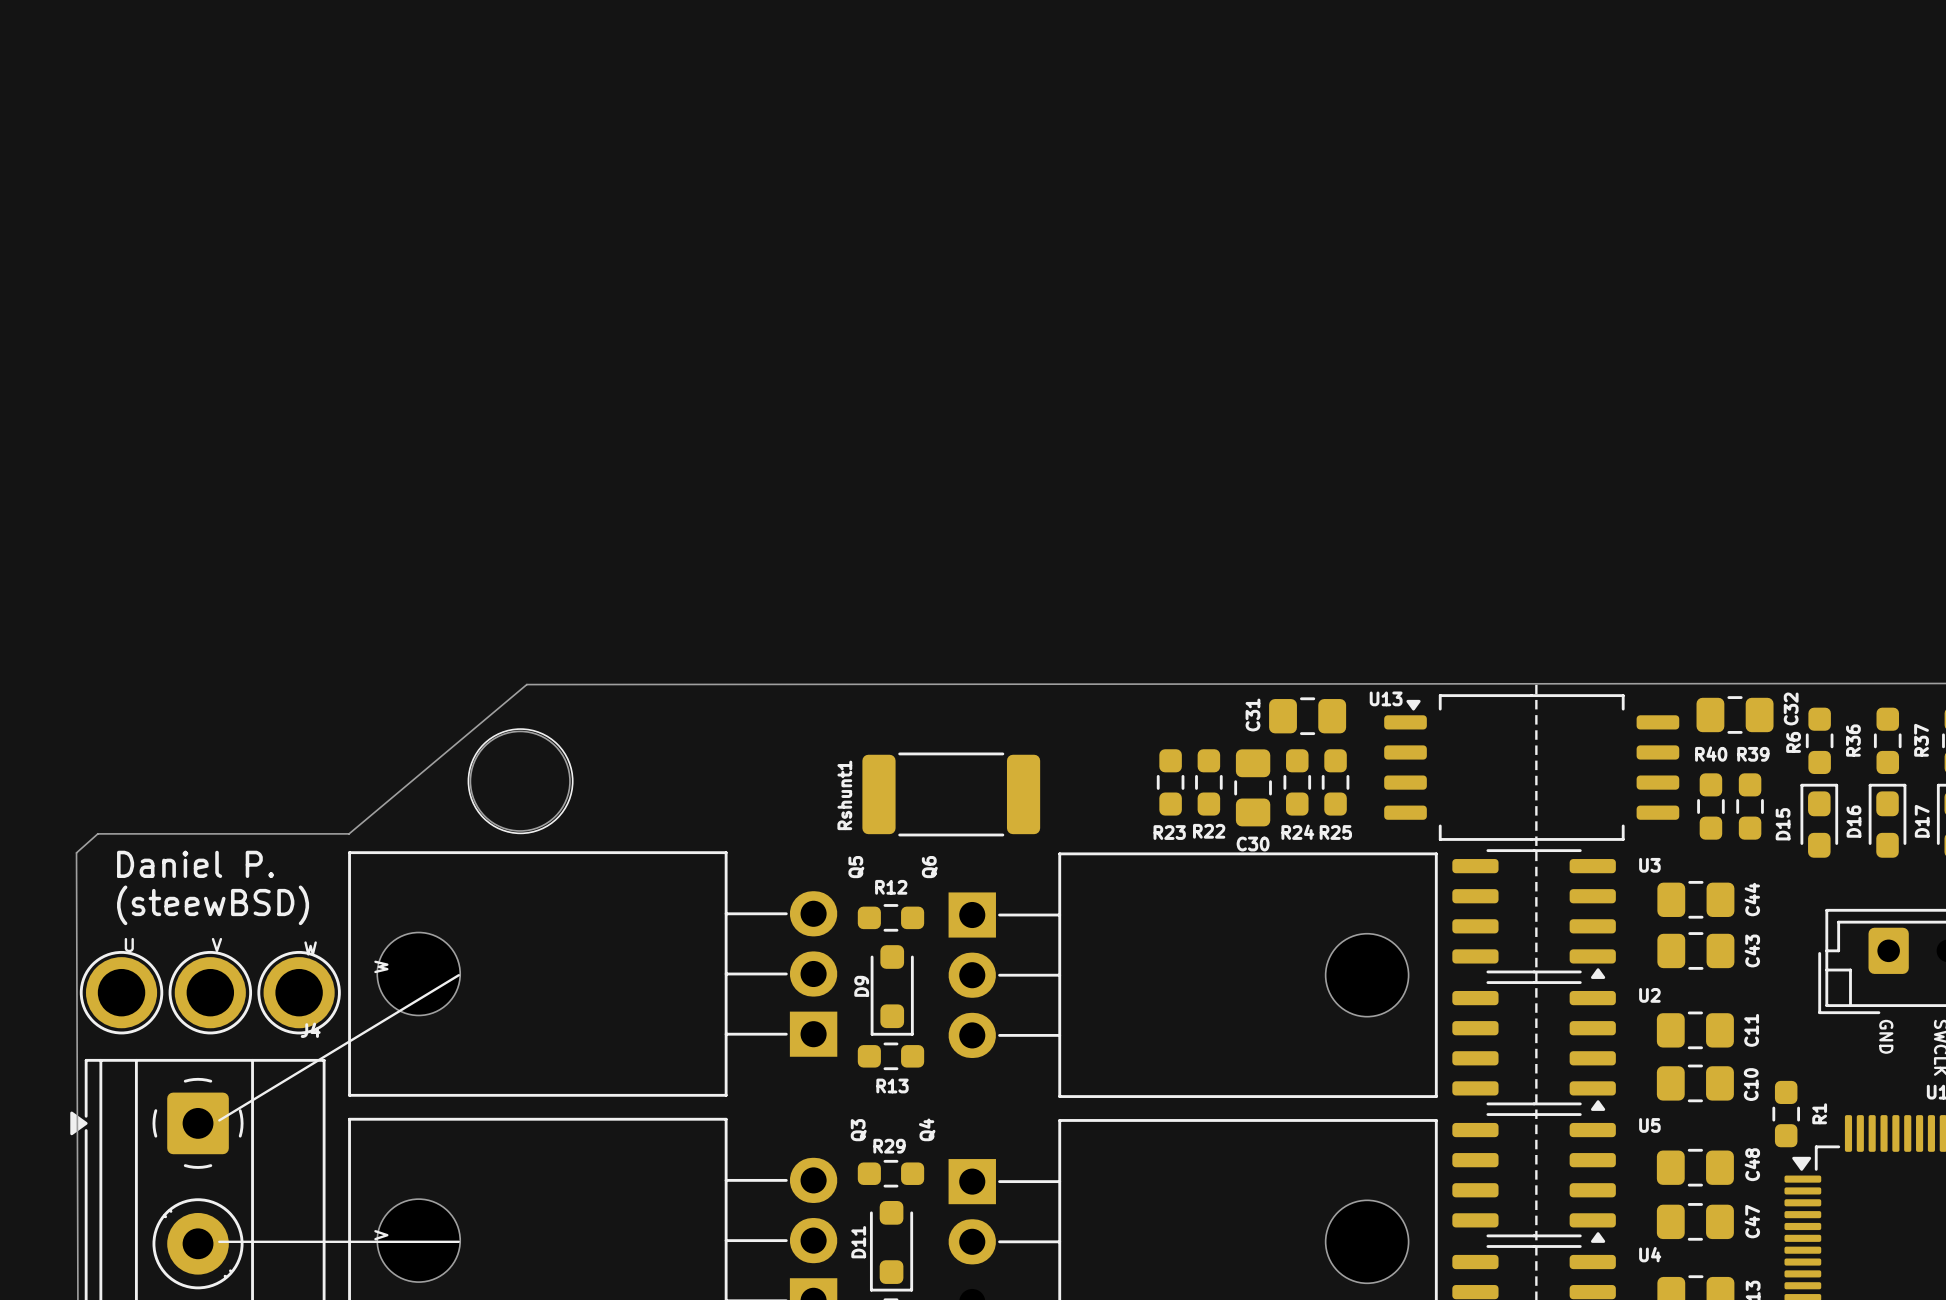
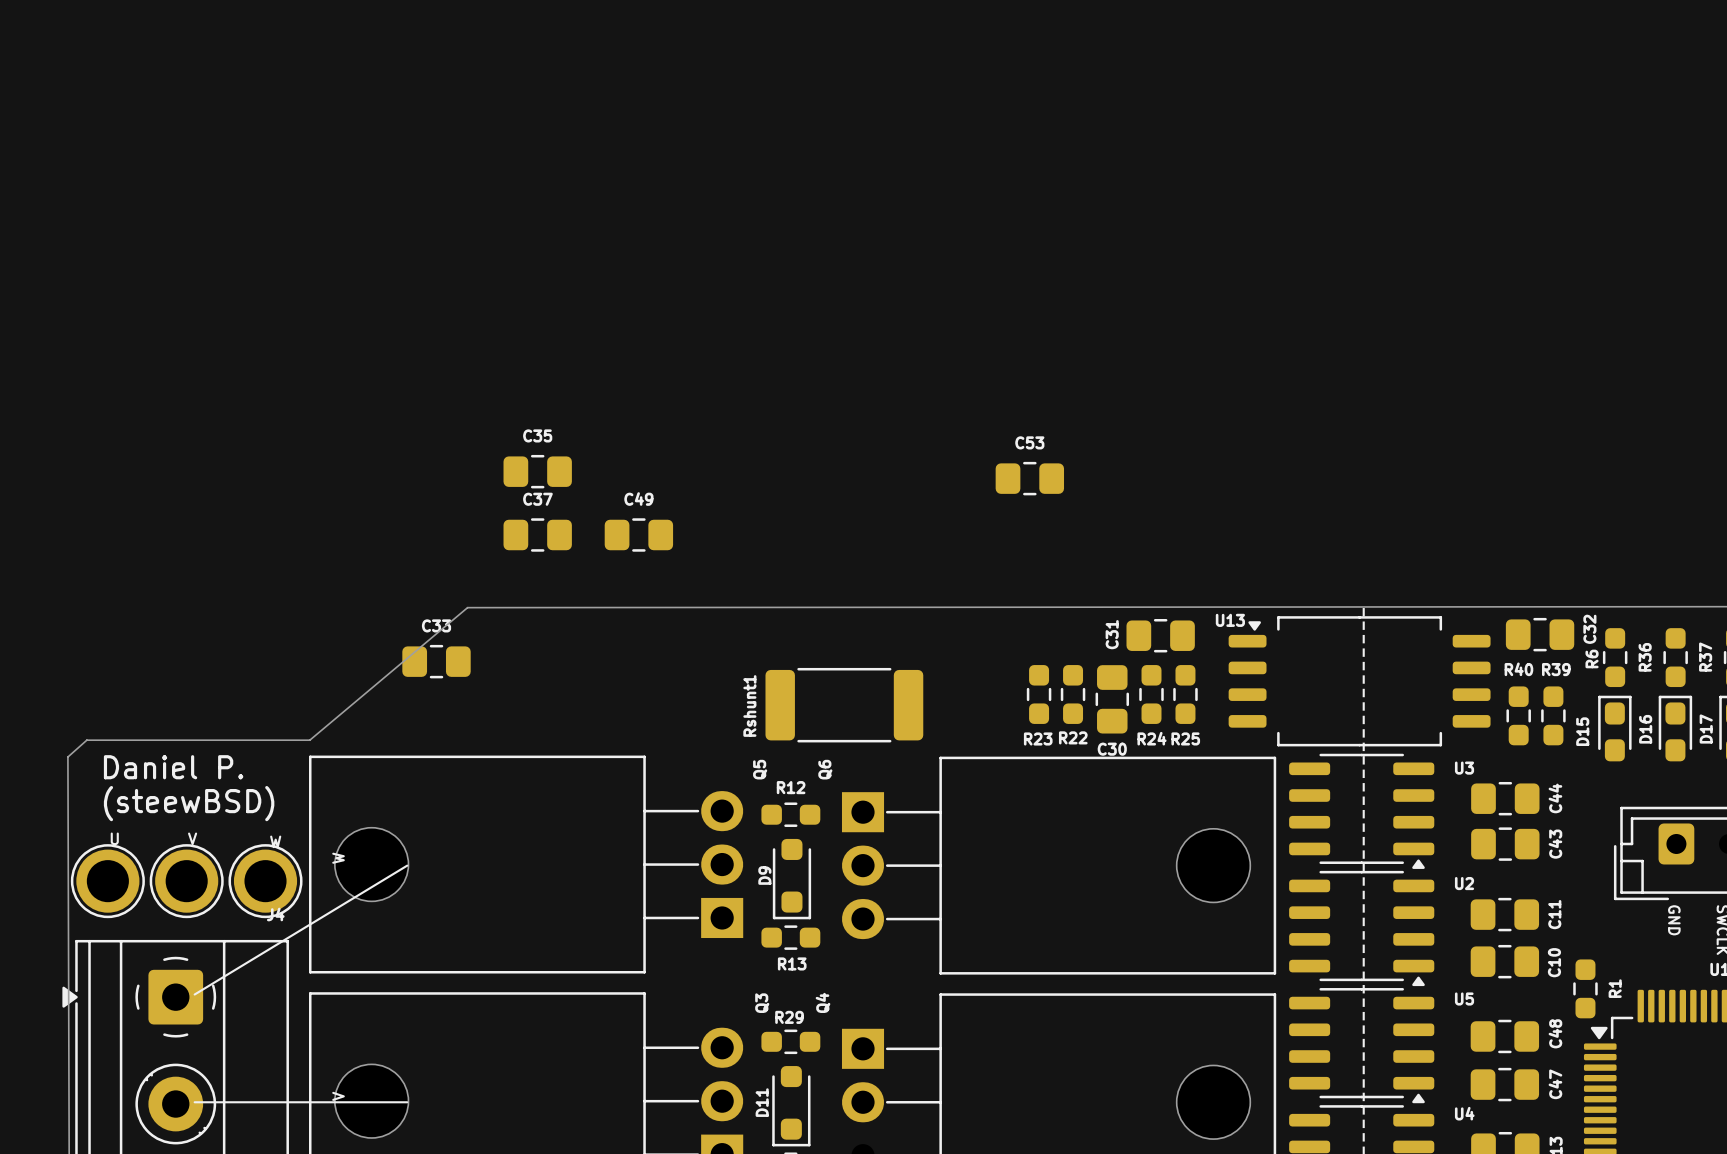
C35: none -> (537, 471)
C53: none -> (1029, 478)
C37: none -> (537, 534)
C49: none -> (638, 534)
drawing: [467, 728, 574, 834] -> none
round board edge: [469, 730, 571, 832] -> none
C33: none -> (436, 661)

